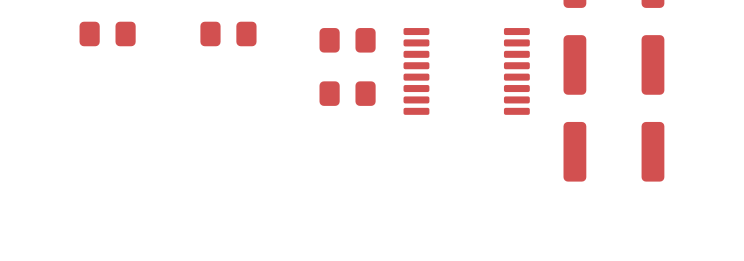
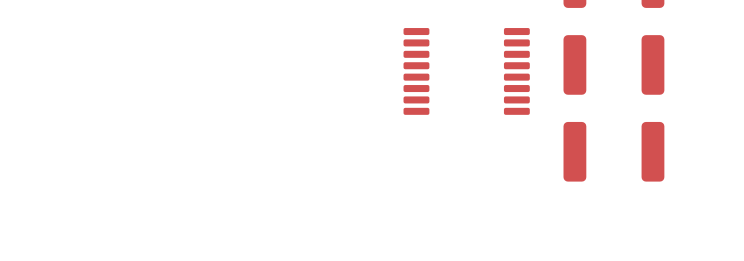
part: (107, 33) -> none
part: (228, 33) -> none
part: (347, 40) -> none
part: (347, 93) -> none

